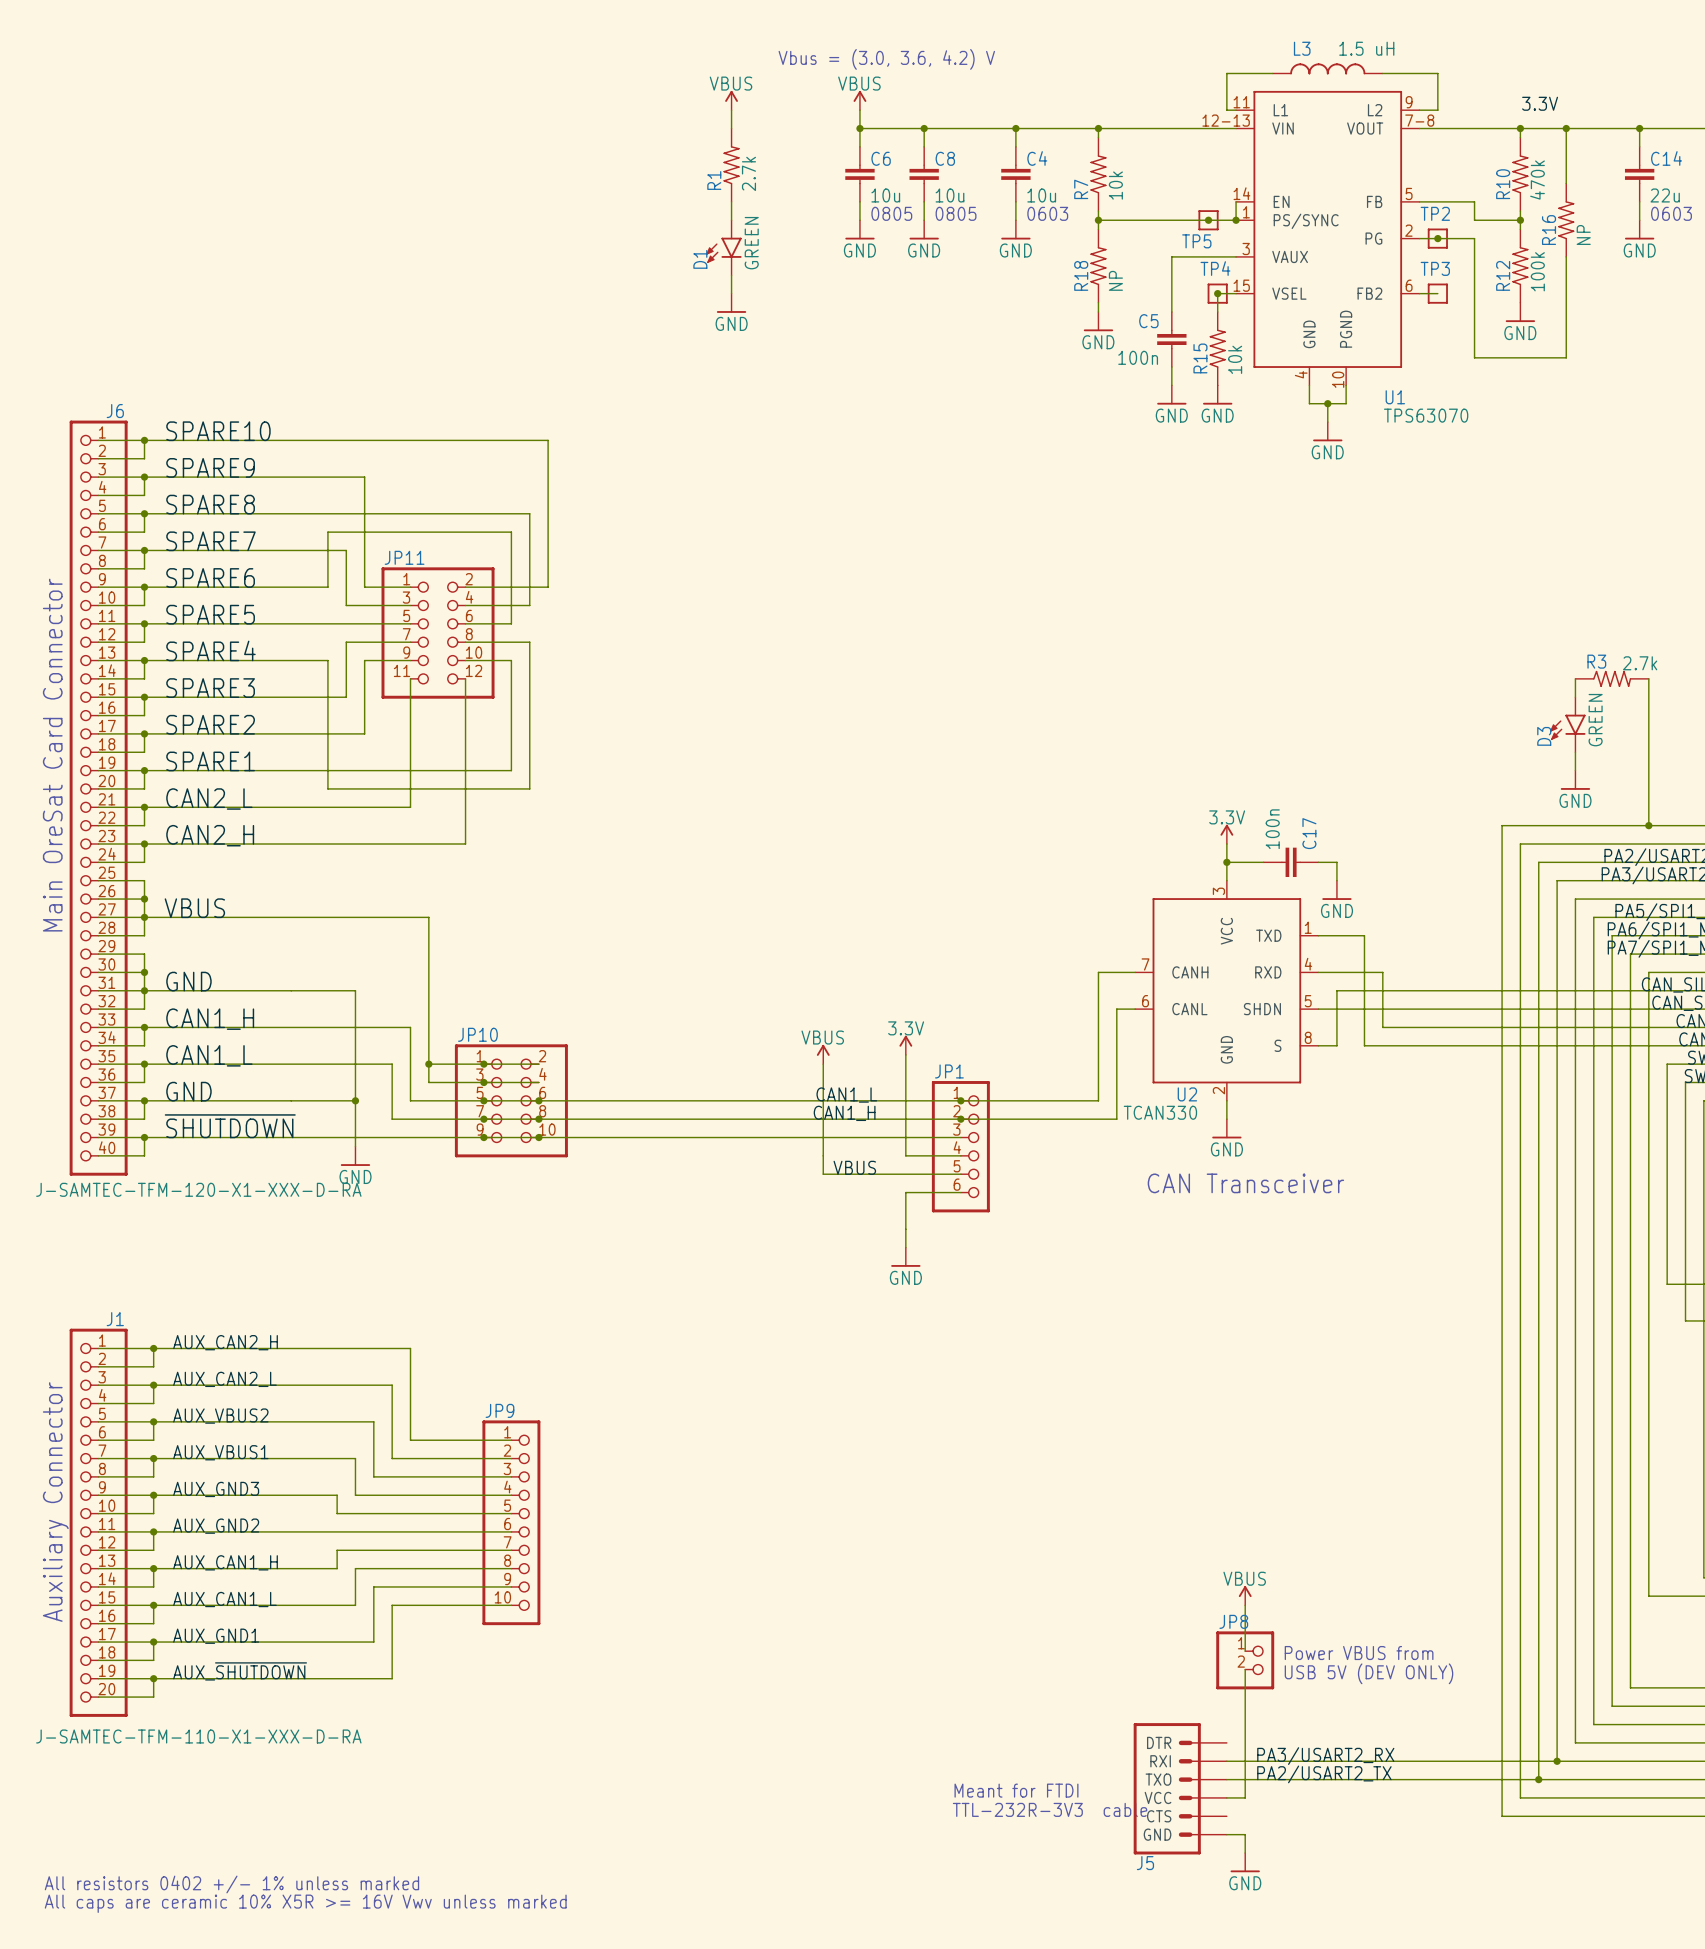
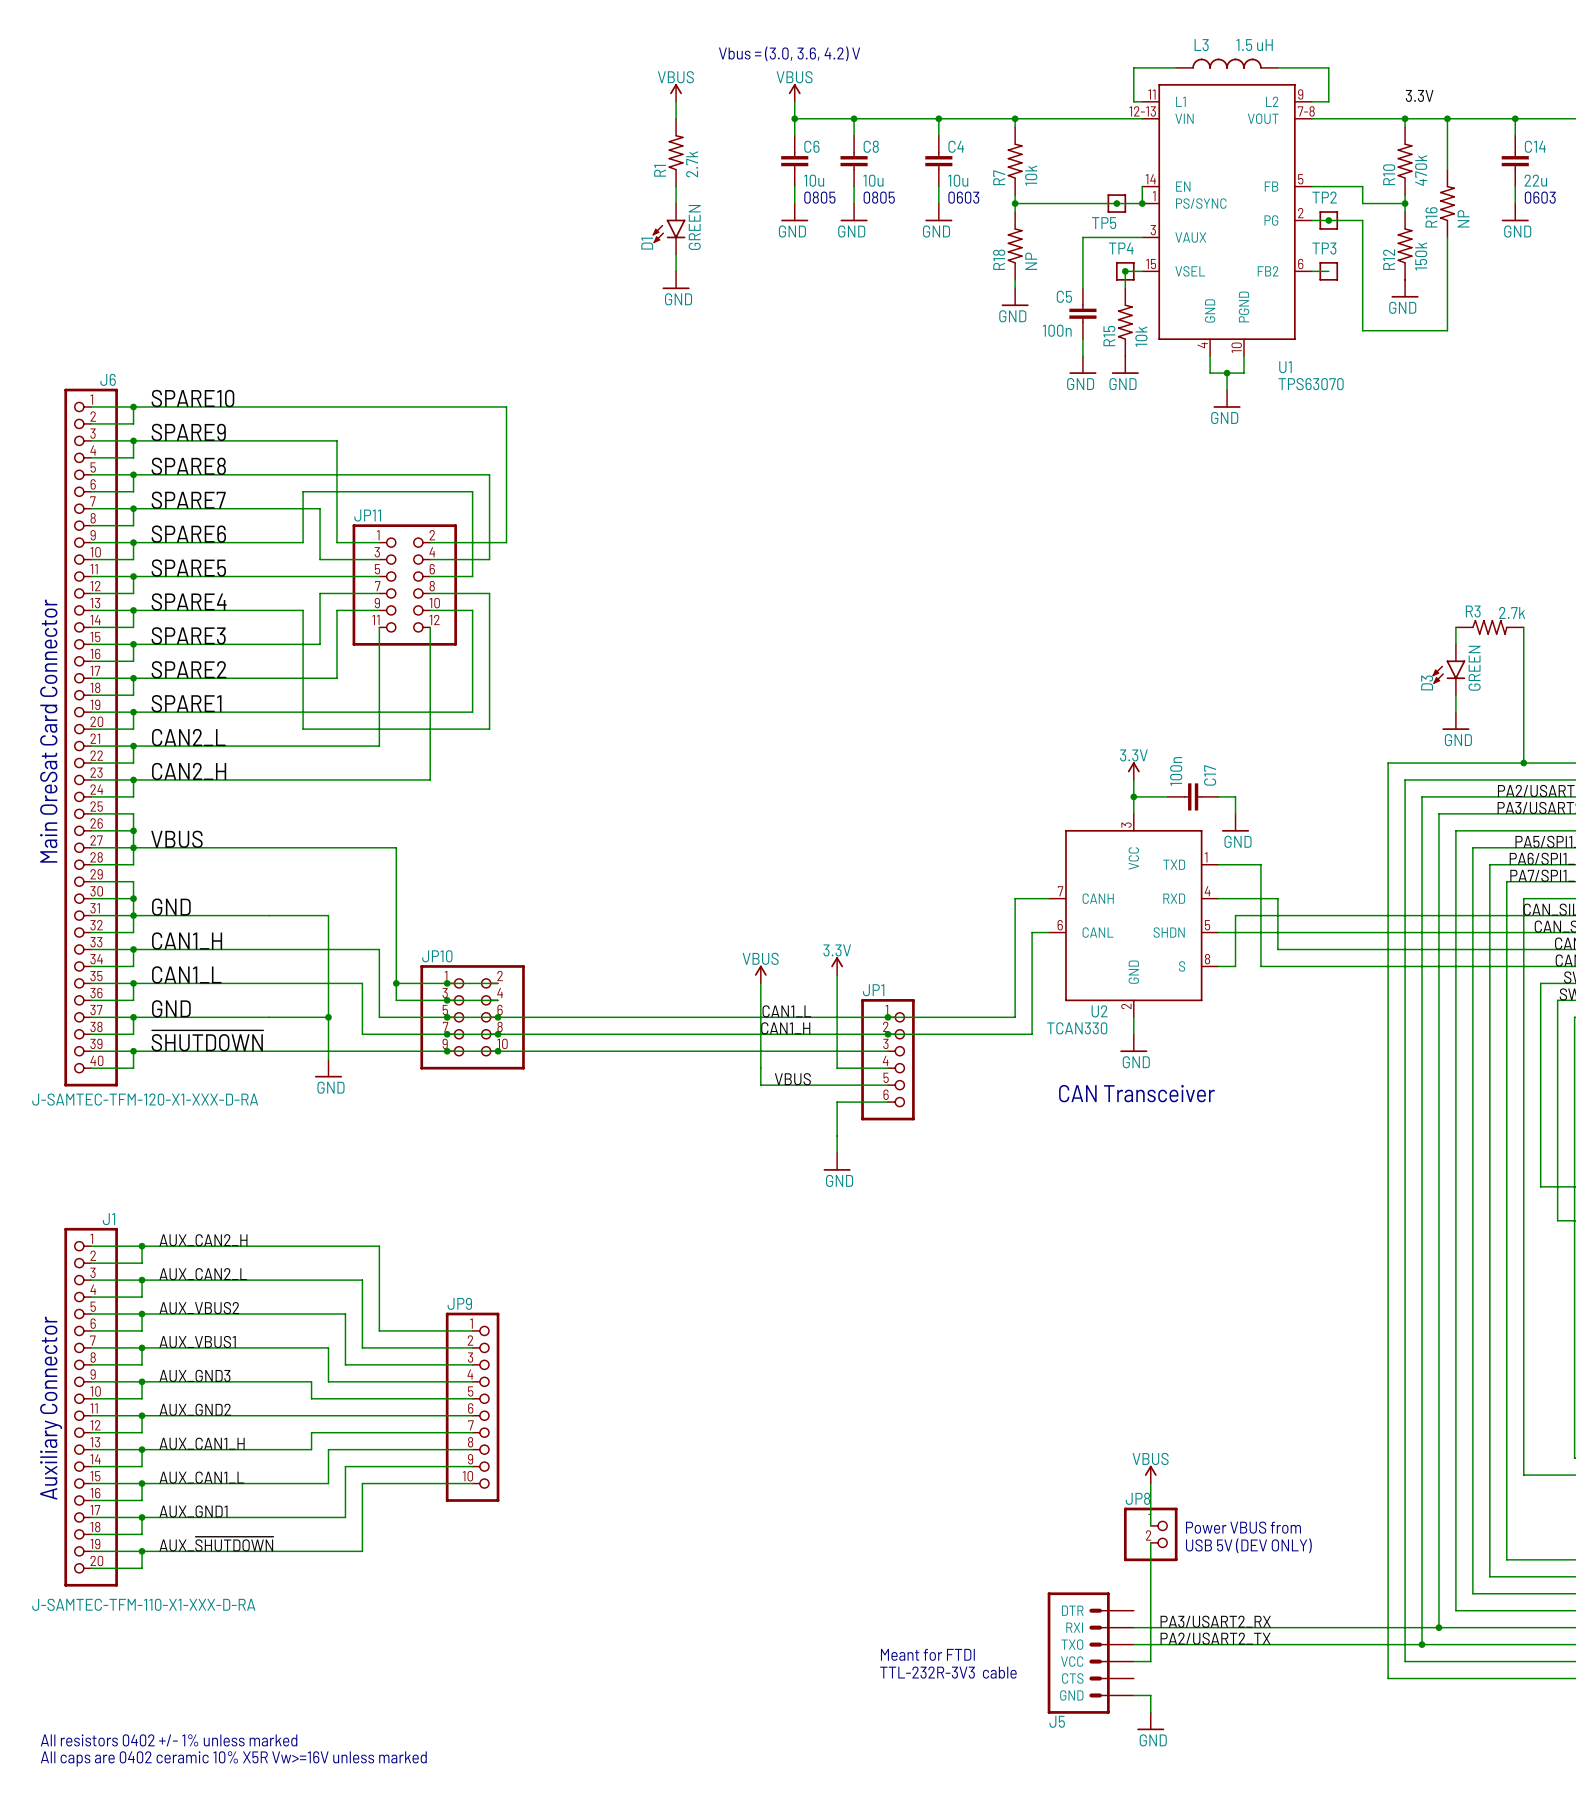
R12 value: 100k (1537, 271) -> 150k (1421, 256)
text: All caps are ceramic 10% X5R >= 16V Vwv unless marked (305, 1903) -> All caps are 0402 ceramic 10% X5R Vw>=16V unless marked (233, 1758)

